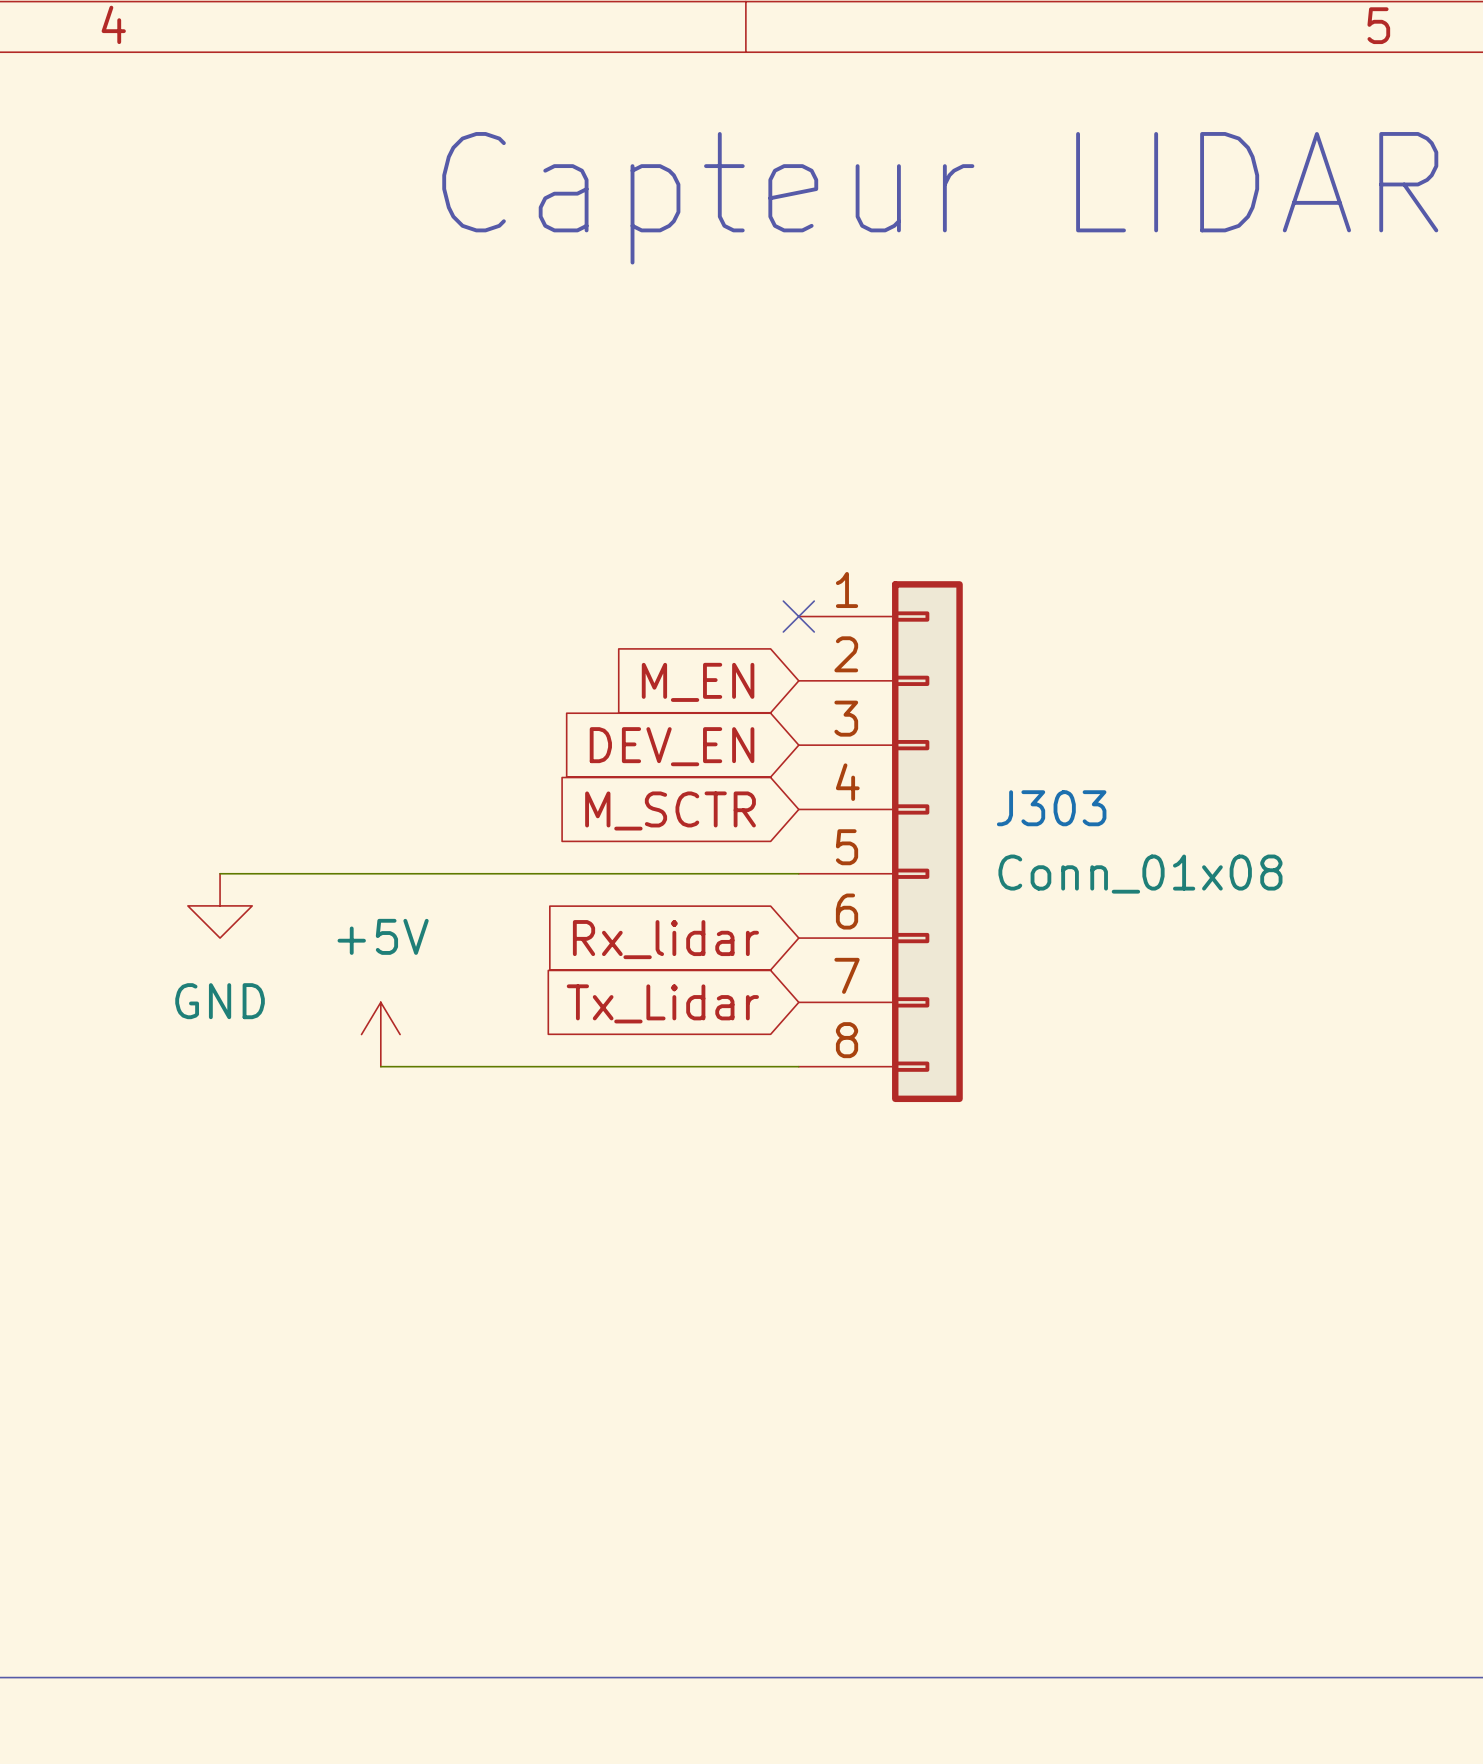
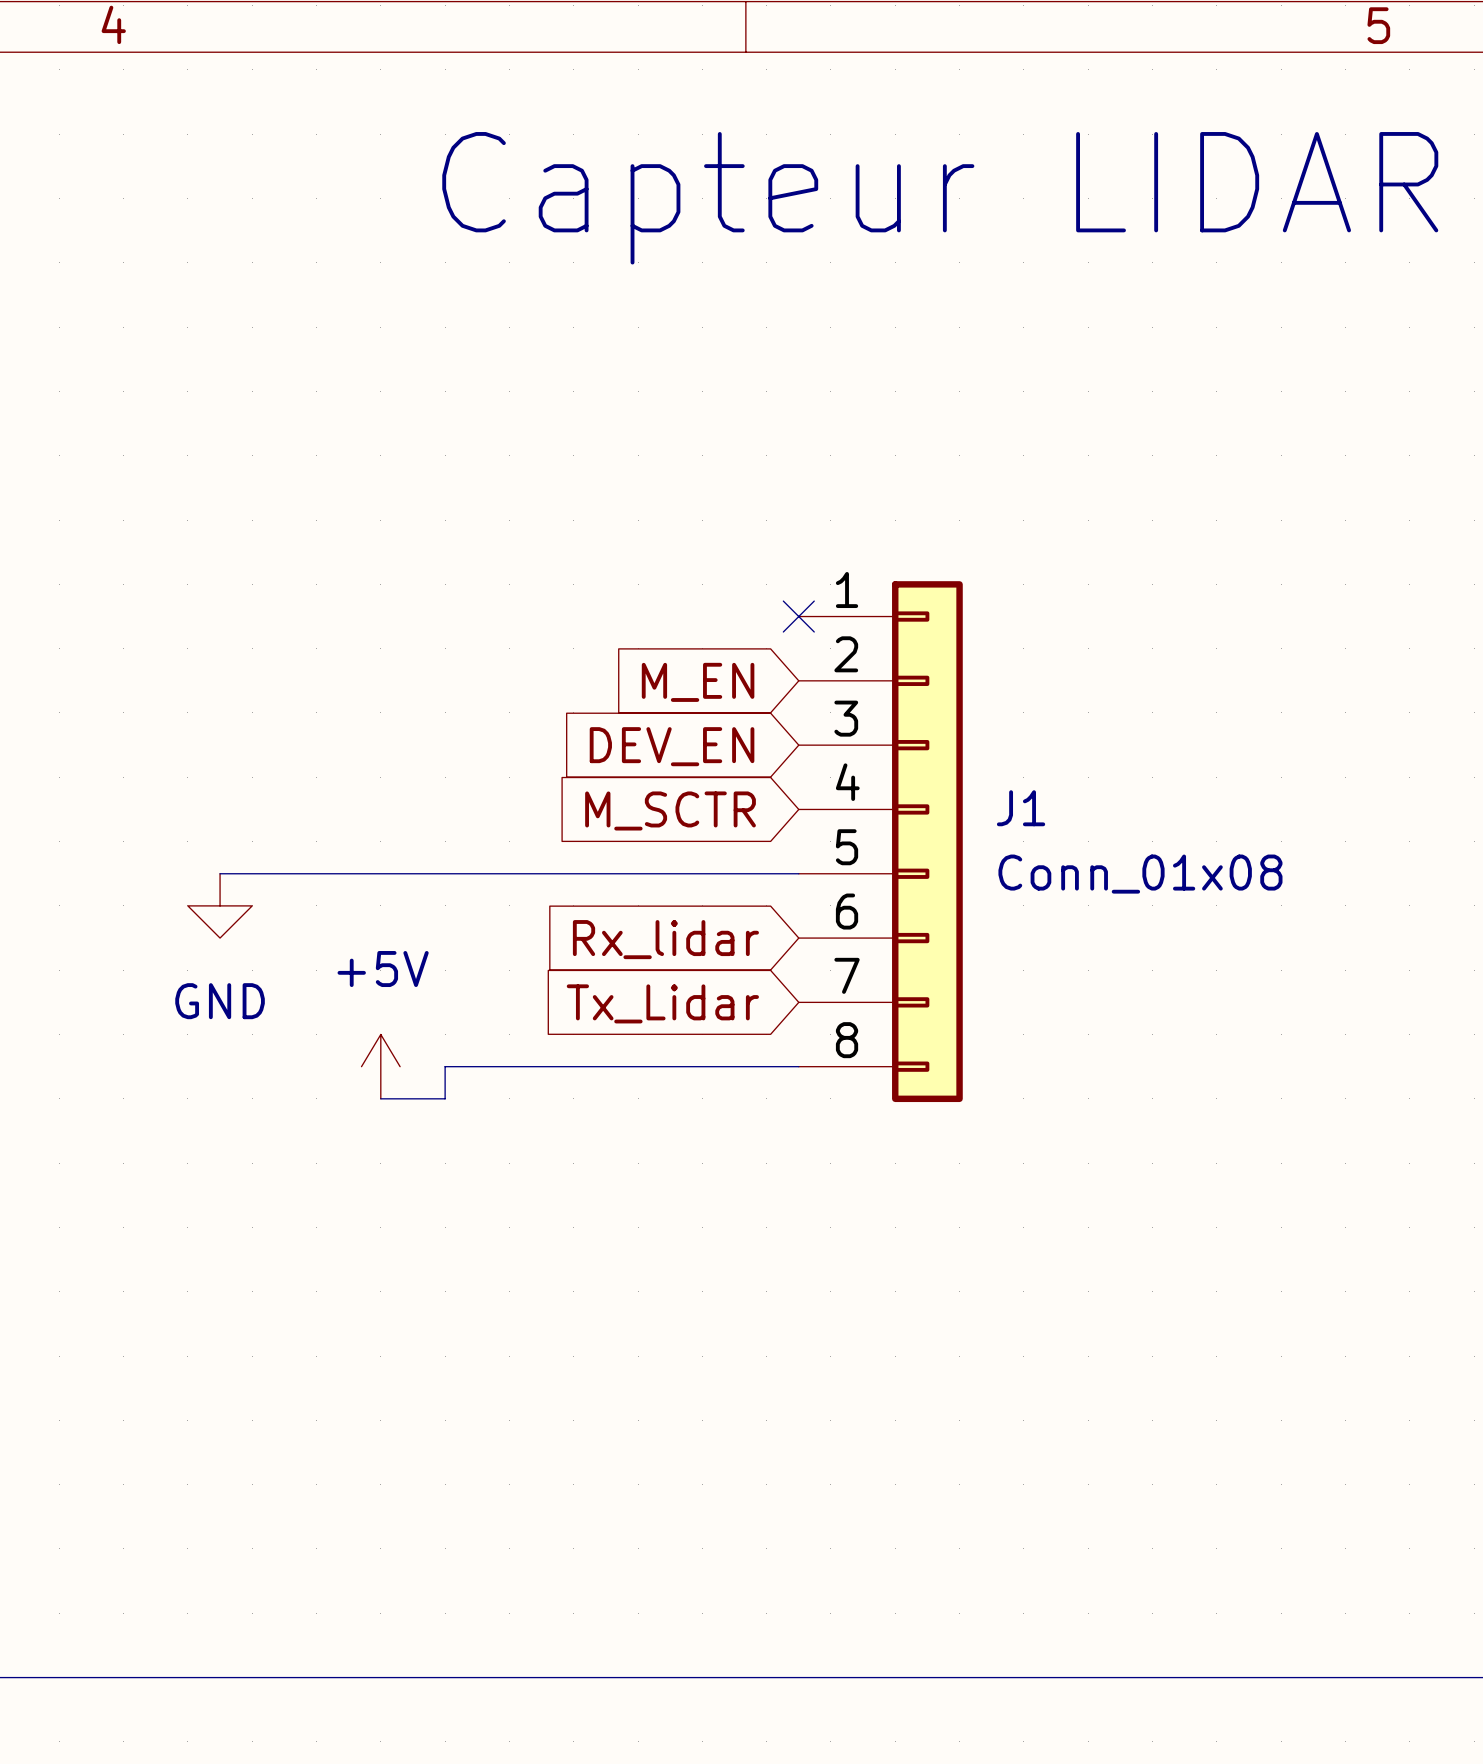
J303 name: J303 (1051, 808) -> J1 (1021, 808)
power symbol position: +5V (380, 1034) -> +5V (380, 1066)
wire: (380, 1066) (445, 1066) -> (380, 1098) (445, 1098) (445, 1066)

